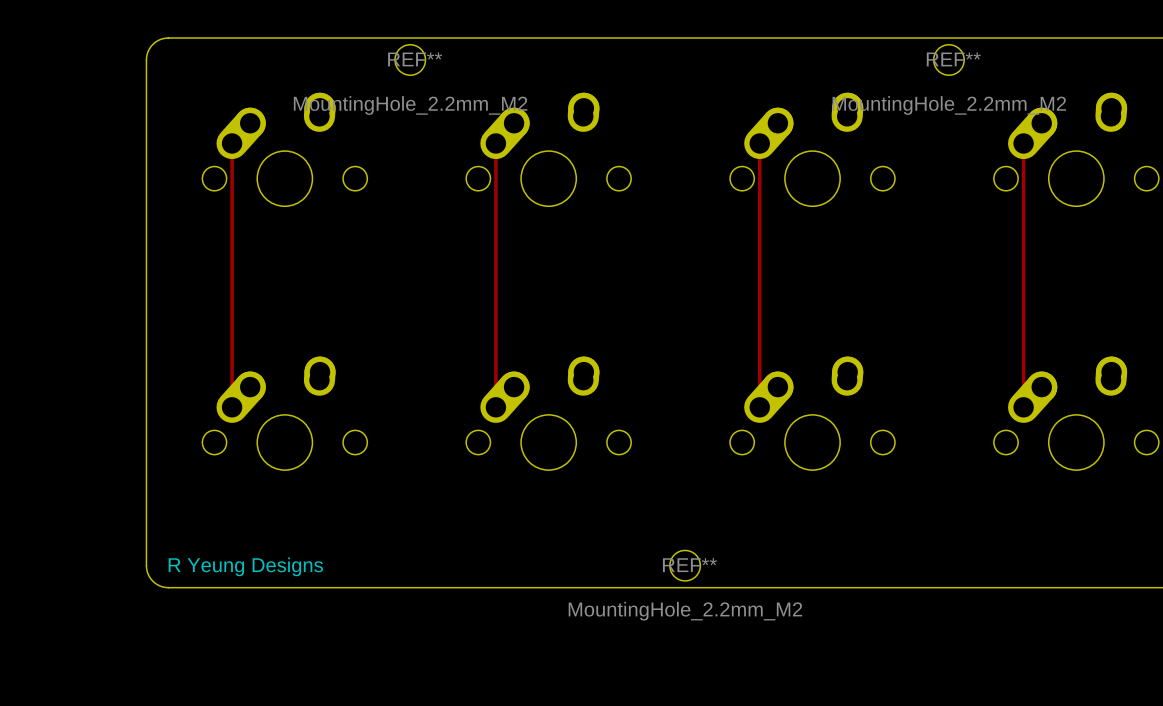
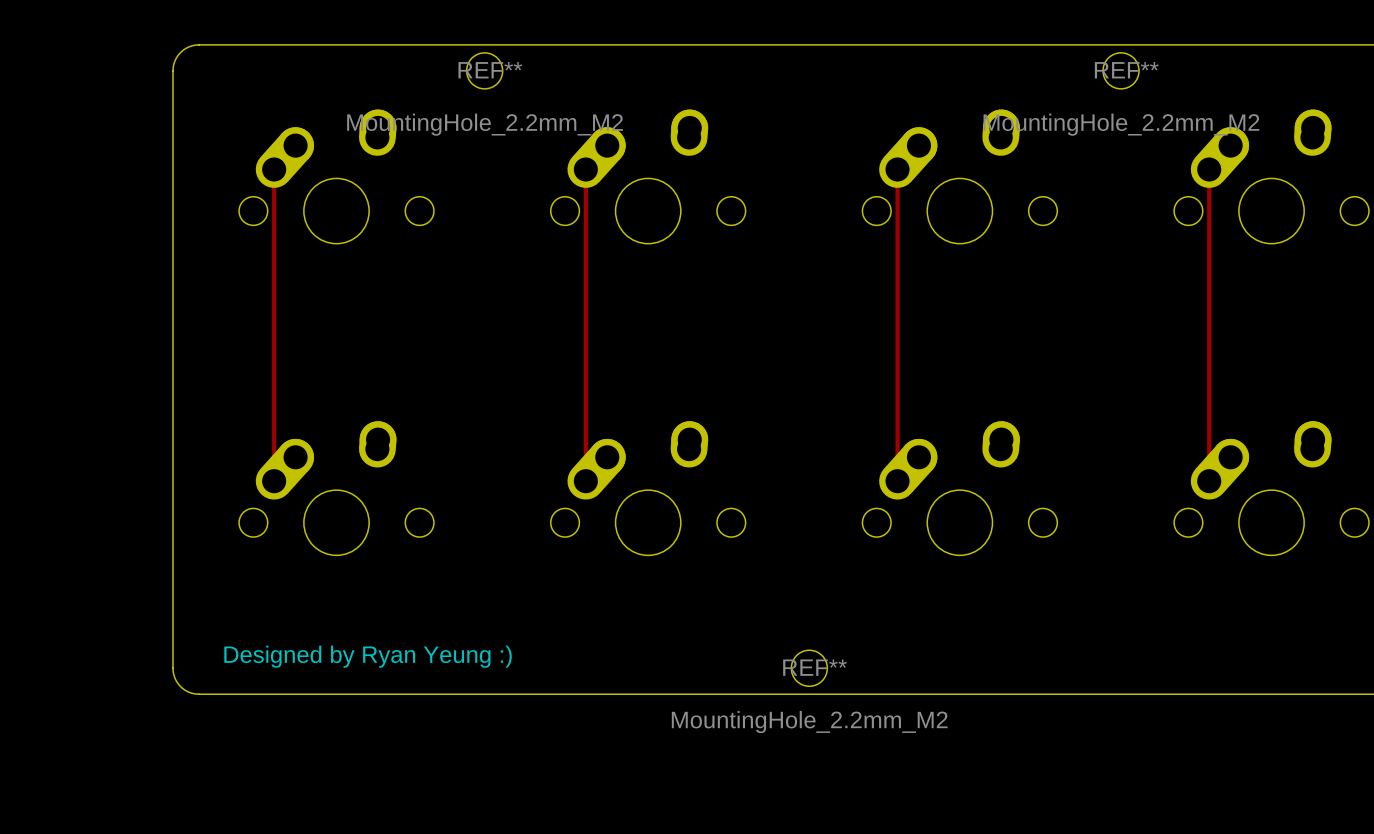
text: none -> Designed by Ryan Yeung :) (368, 656)
text: R Yeung Designs (245, 566) -> none

